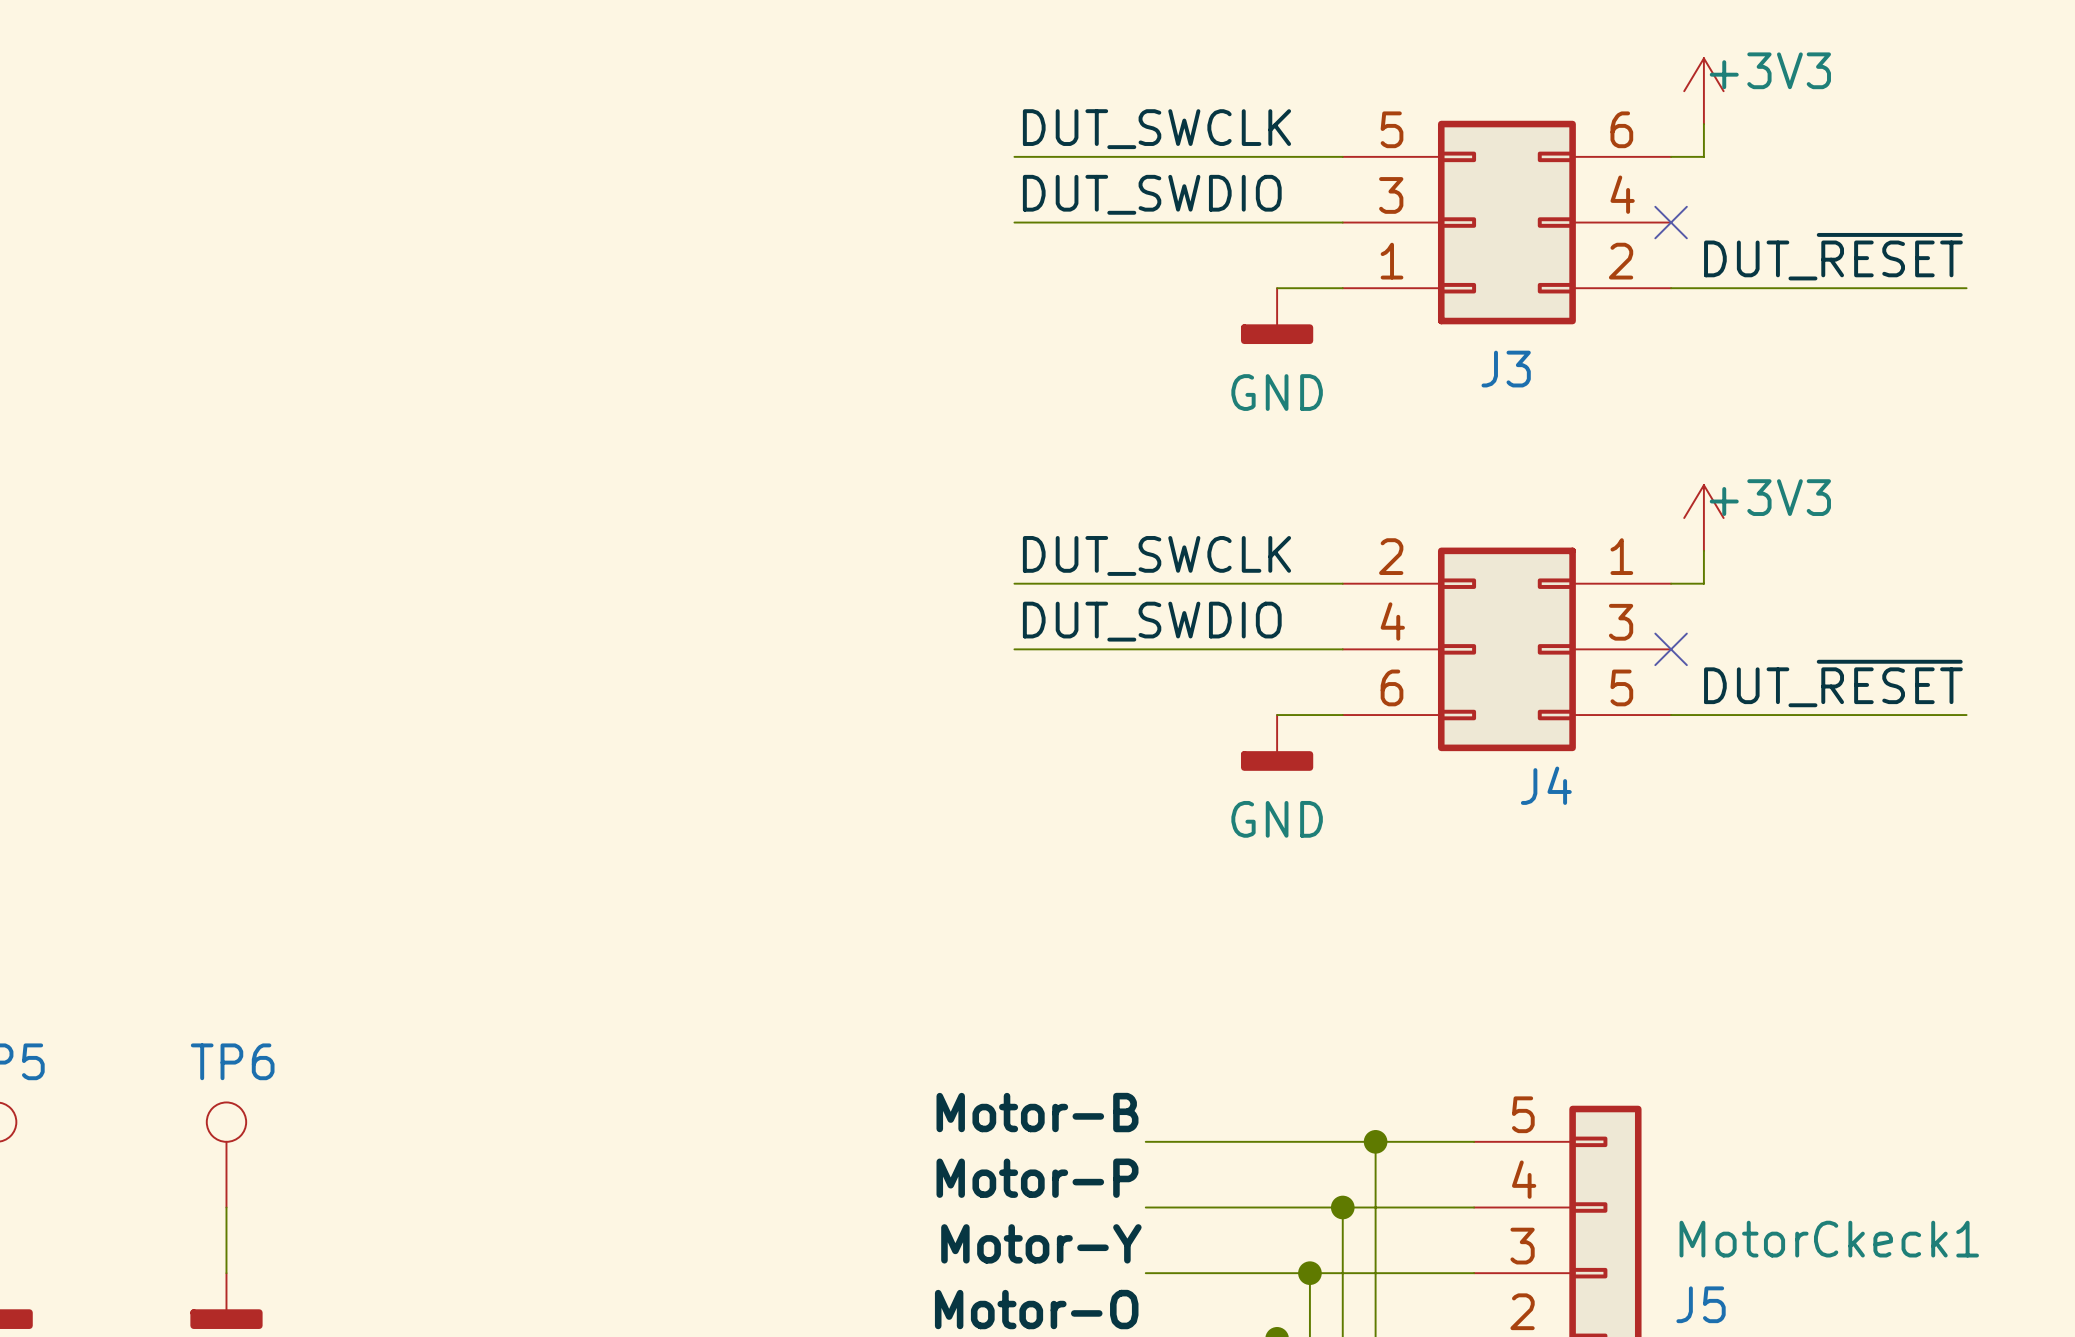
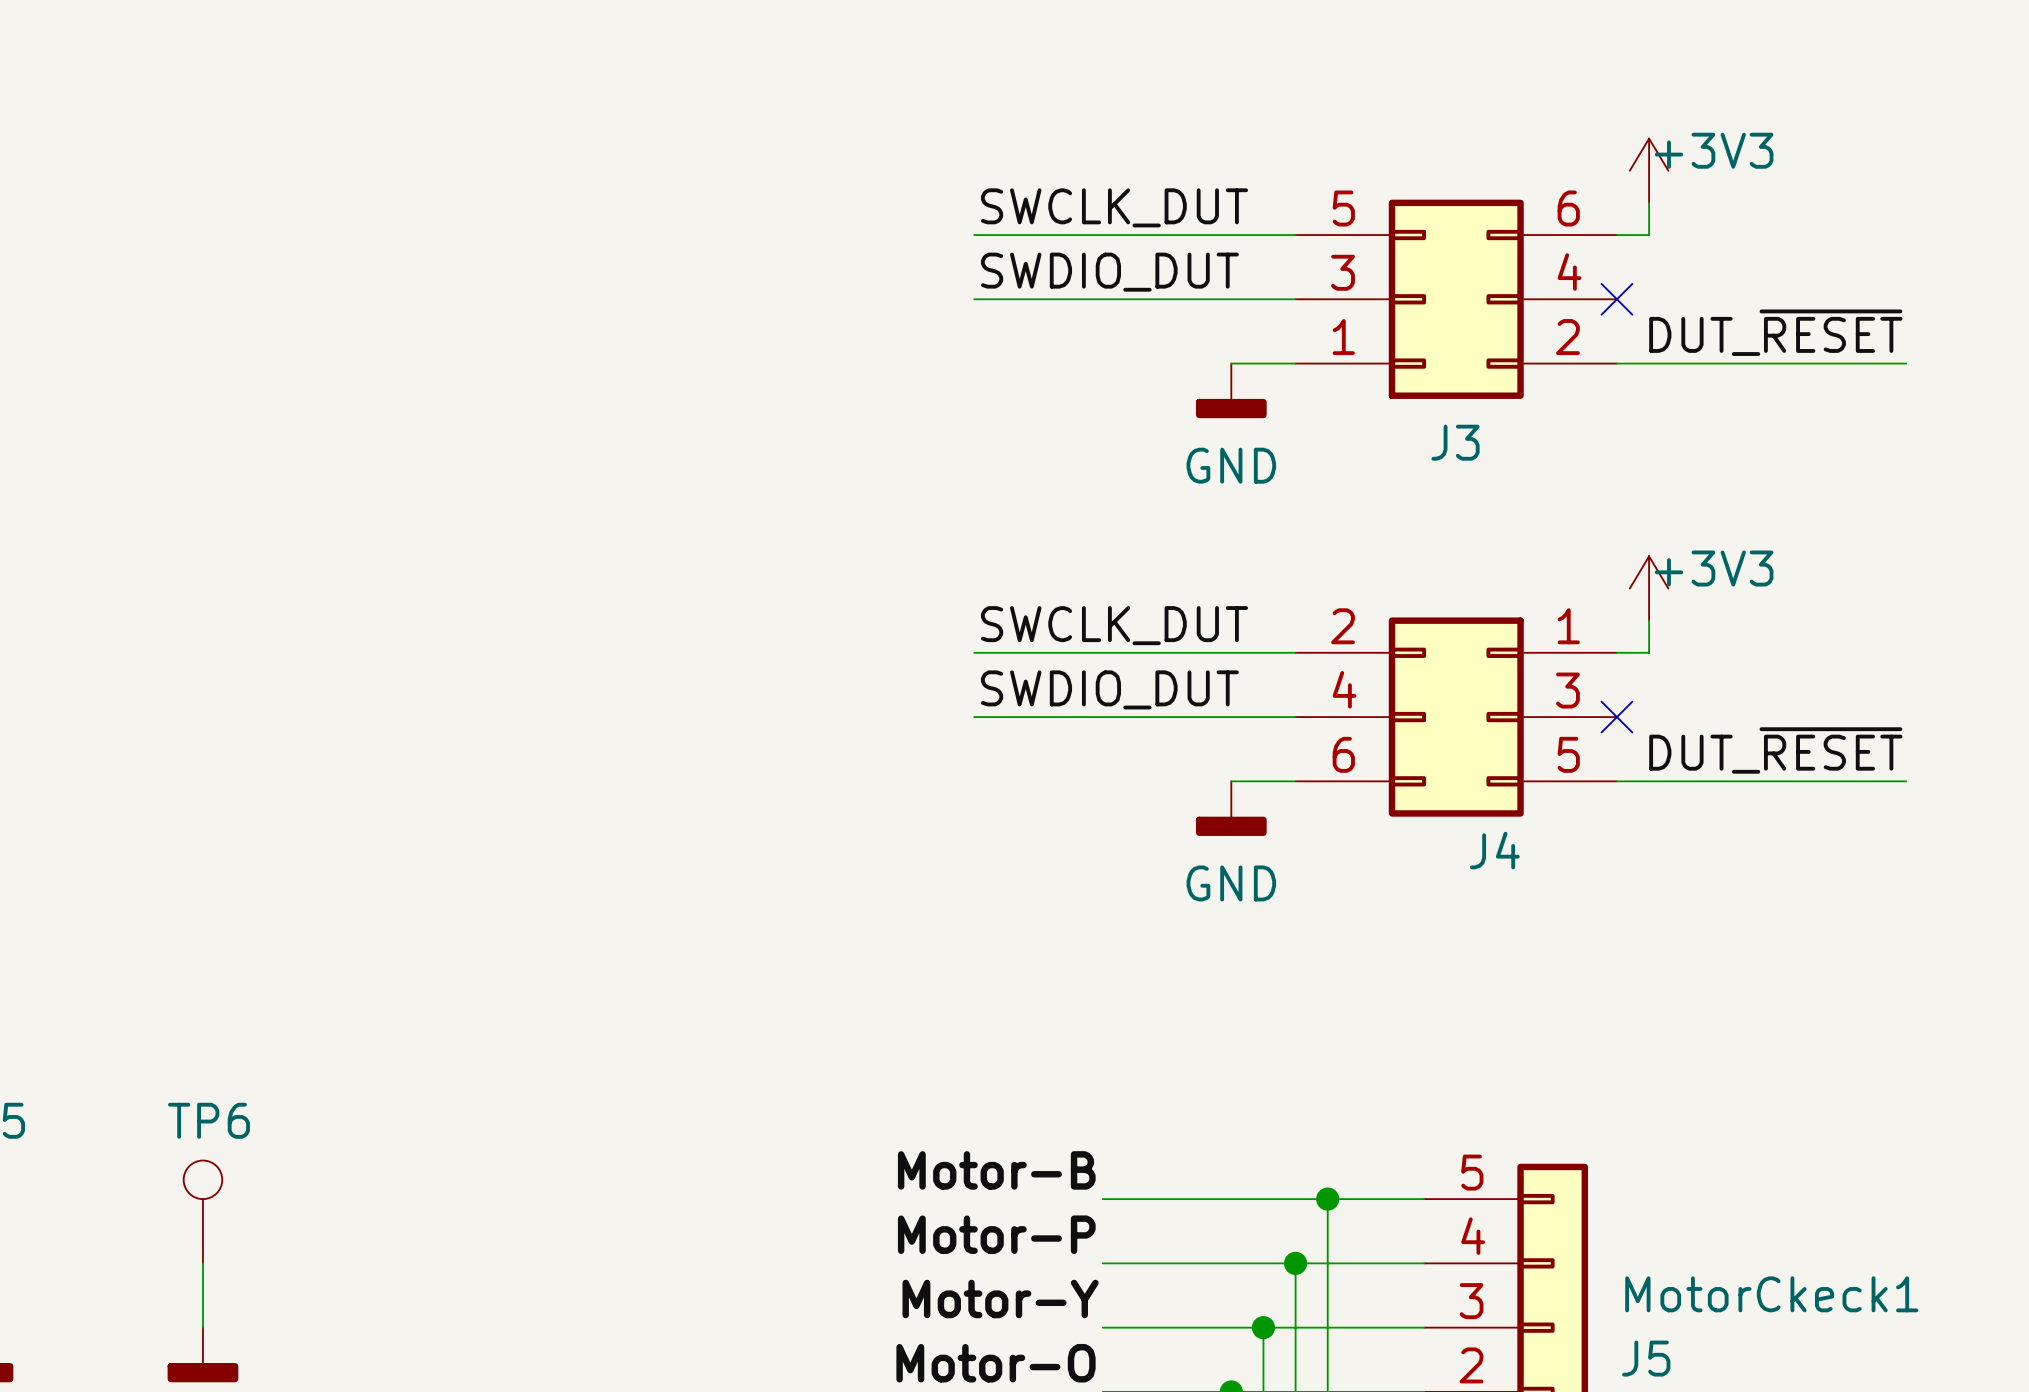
label: DUT_SWCLK (1156, 129) -> SWCLK_DUT (1114, 207)
label: DUT_SWDIO (1152, 194) -> SWDIO_DUT (1109, 272)
label: DUT_SWCLK (1156, 555) -> SWCLK_DUT (1114, 625)
label: DUT_SWDIO (1152, 621) -> SWDIO_DUT (1109, 689)

